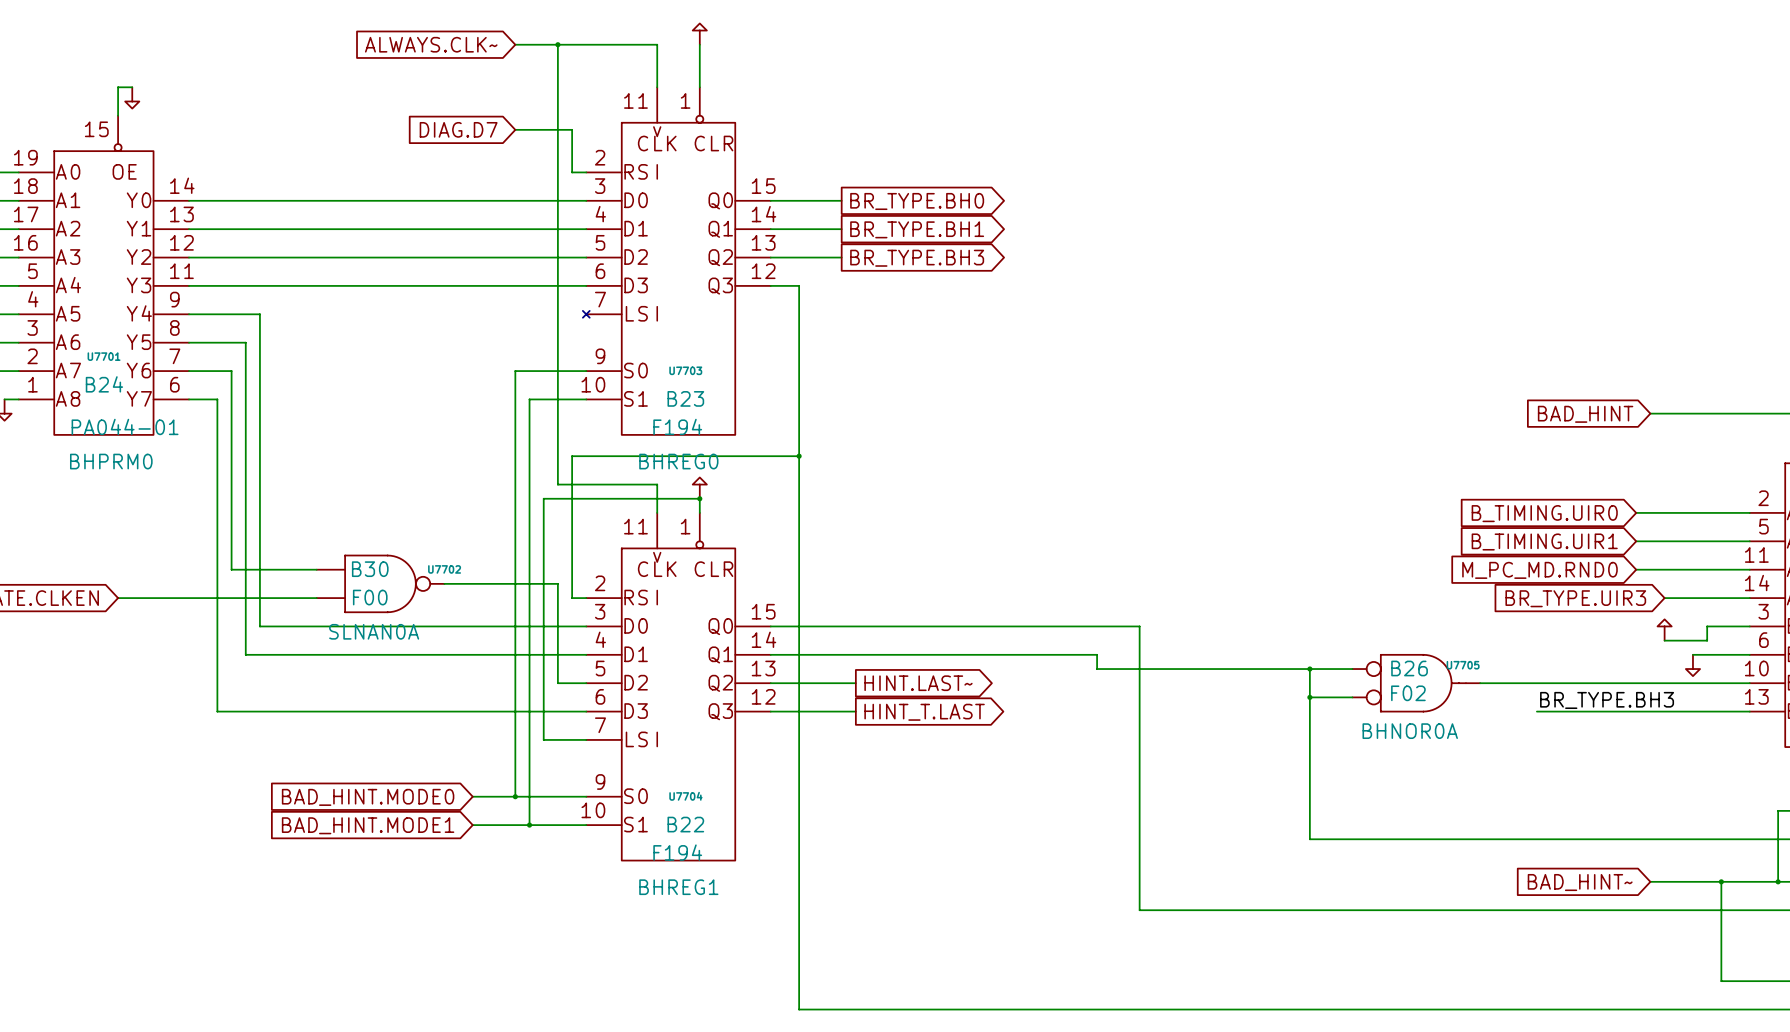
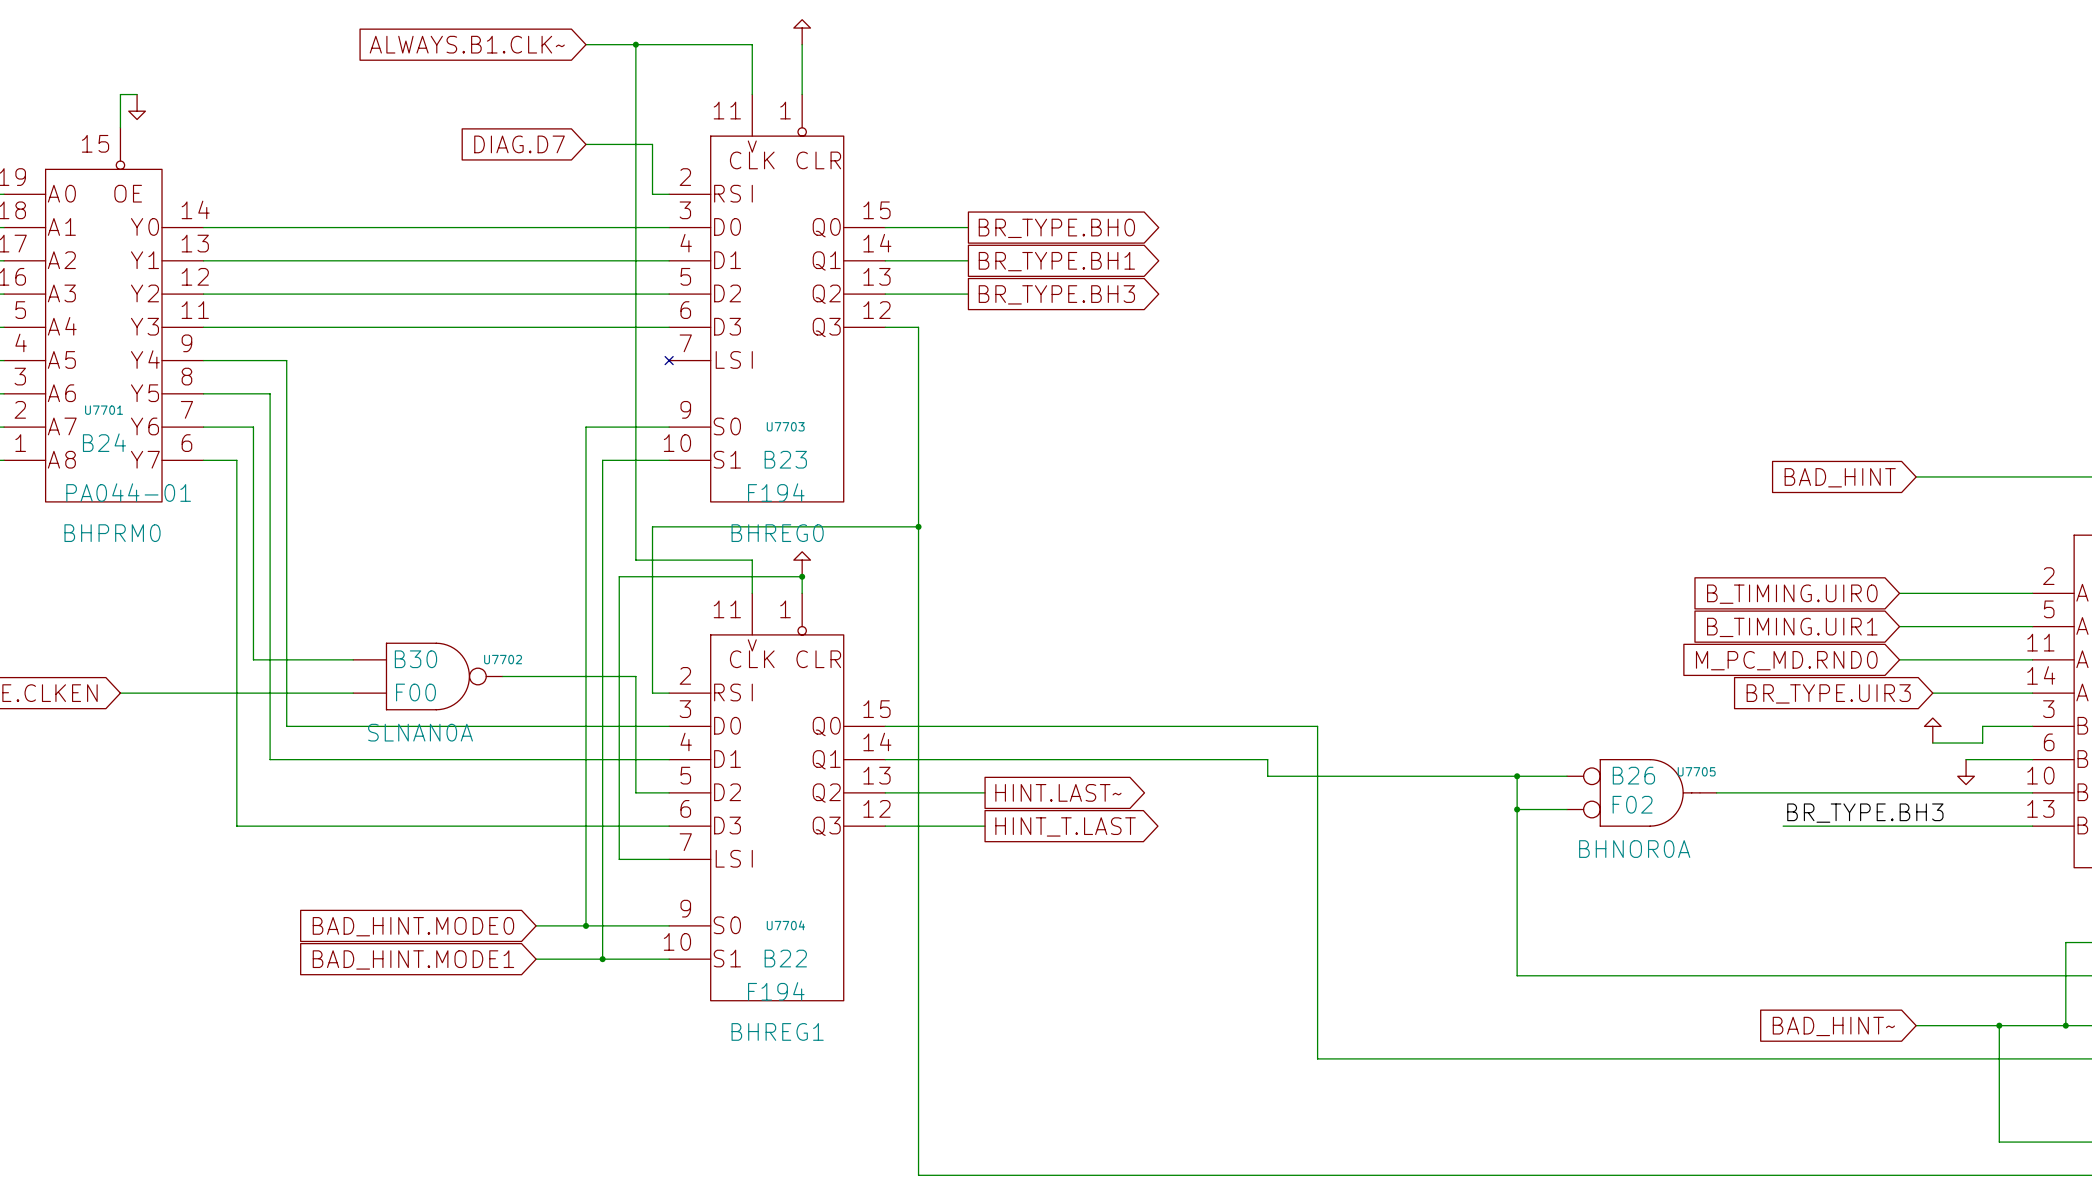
global label: ALWAYS.CLK~ (431, 44) -> ALWAYS.B1.CLK~ (467, 44)

